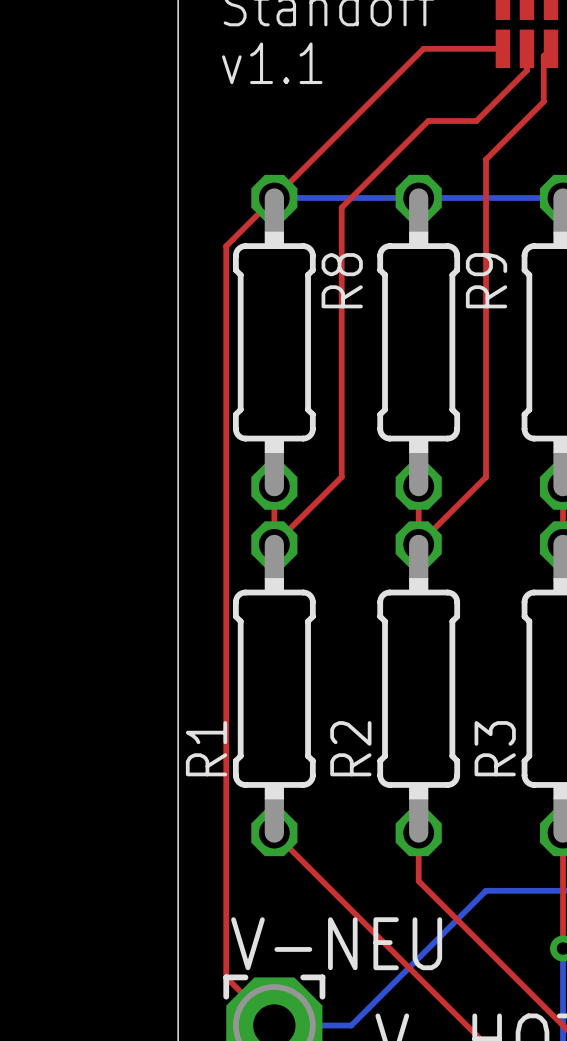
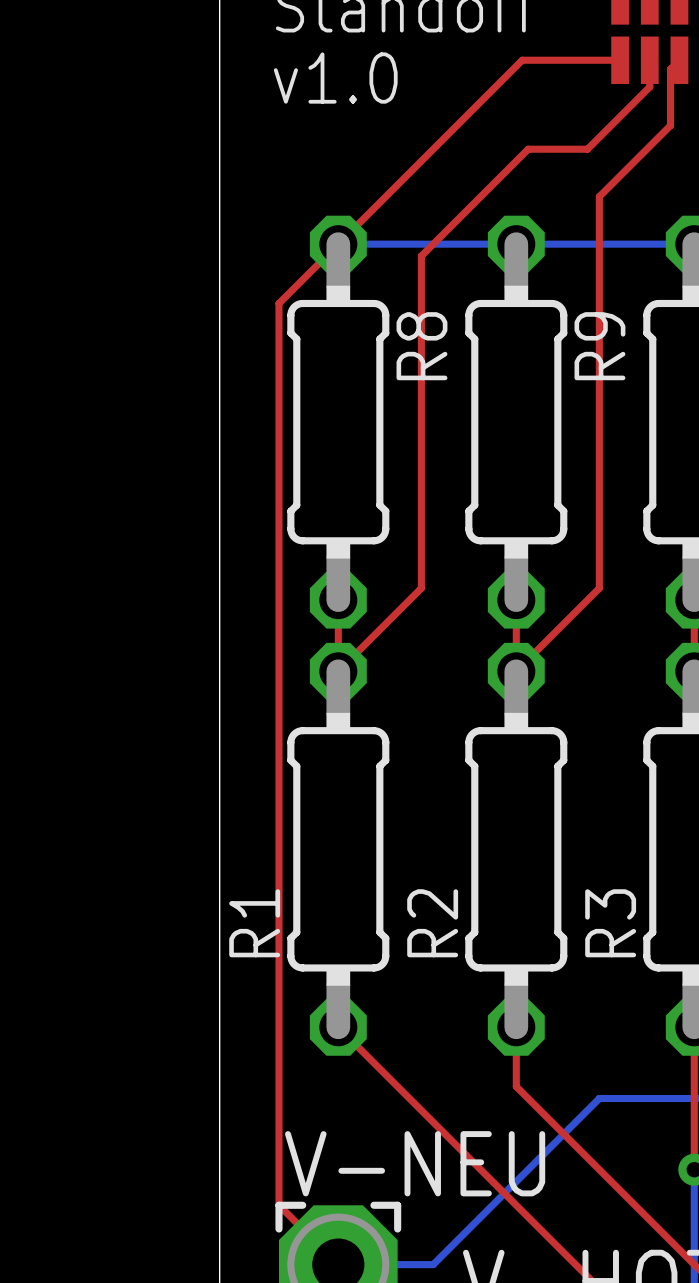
text: v1.1 (272, 63) -> v1.0 (335, 78)

